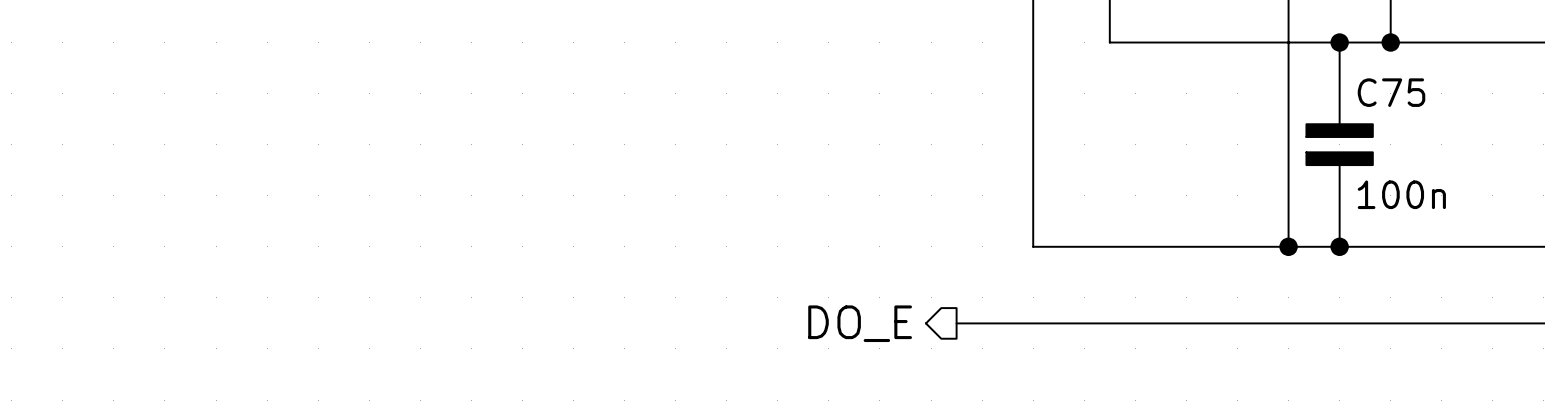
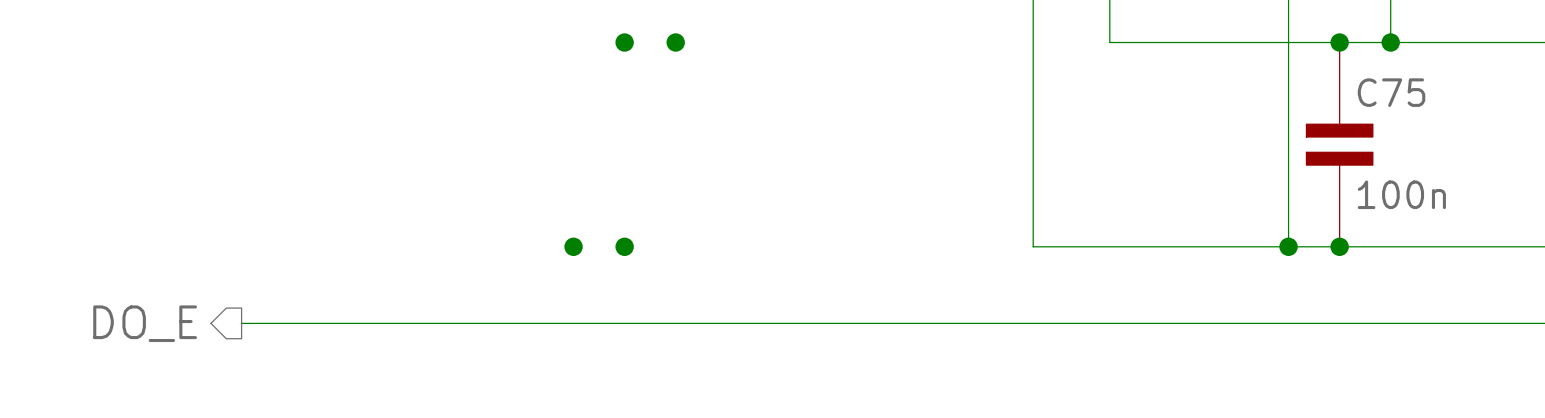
junction: none -> (624, 42)
junction: none -> (675, 42)
junction: none -> (573, 246)
junction: none -> (624, 246)
hierarchical label: none -> DO_E (145, 323)
wire: none -> (241, 323) (956, 323)
hierarchical label: DO_E (860, 323) -> none

